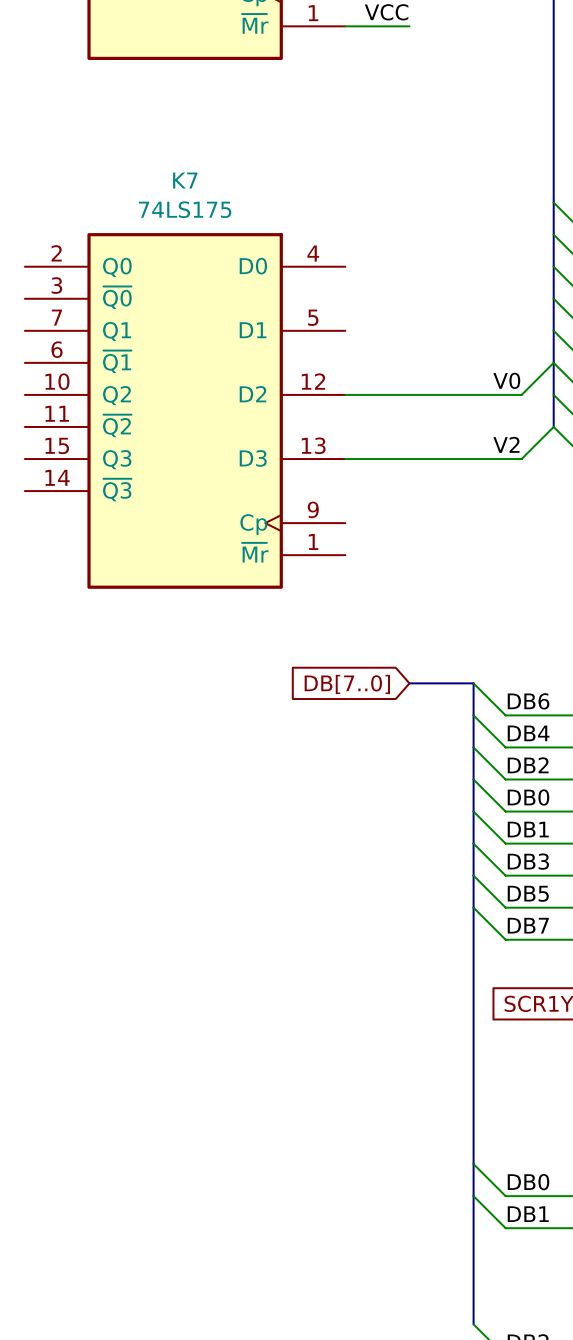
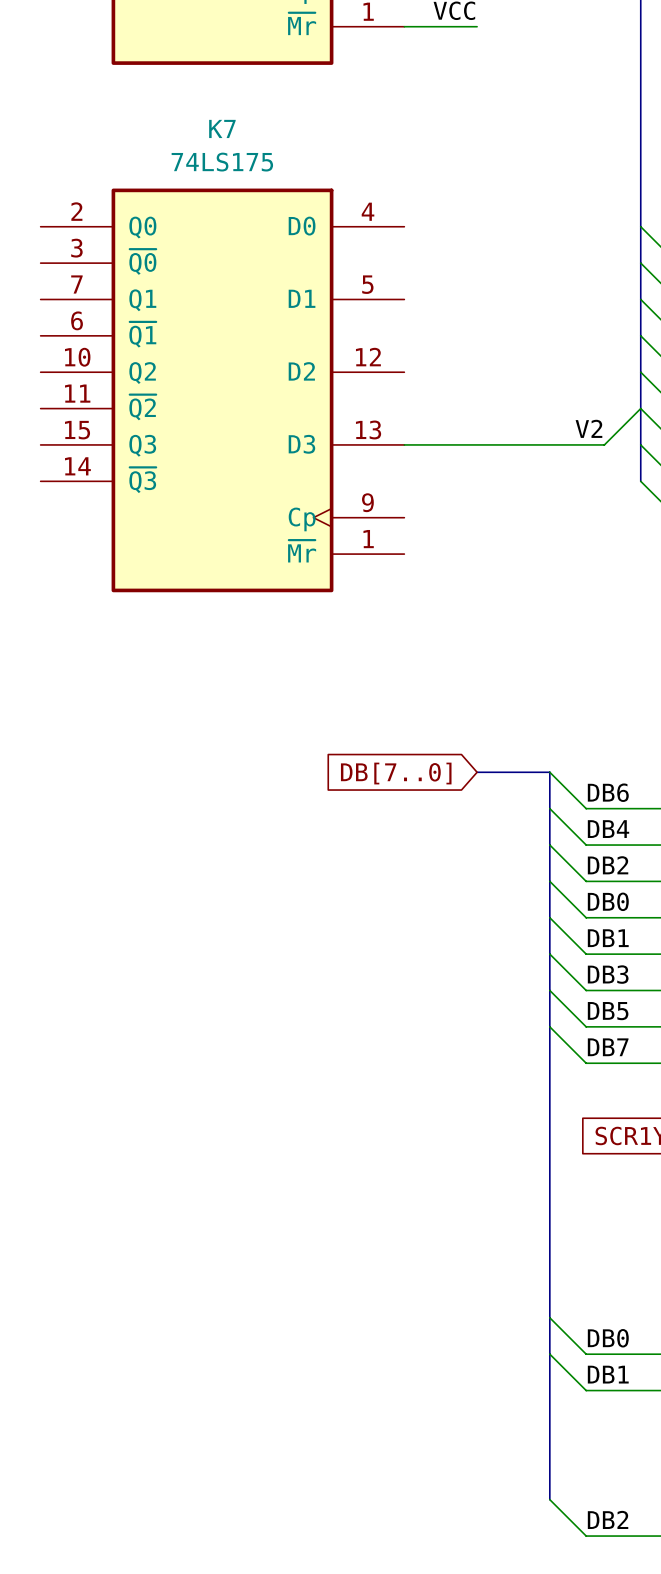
label: V0 (506, 380) -> V2 (588, 428)
K7 position: (185, 410) -> (222, 390)
wire: (553, 426) (521, 459) (345, 459) -> none
label: V2 (506, 444) -> none

